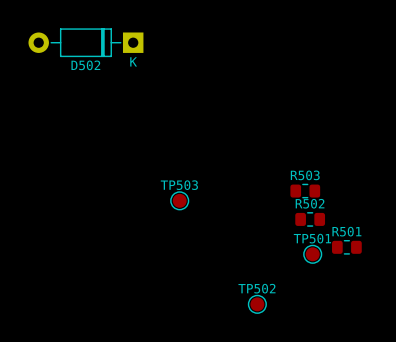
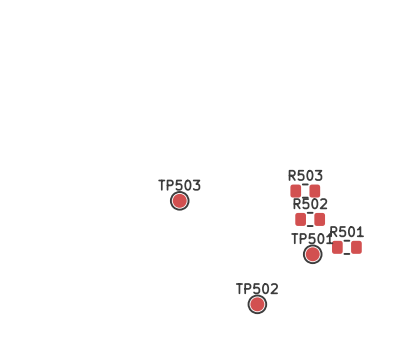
D502: (85, 42) -> none

